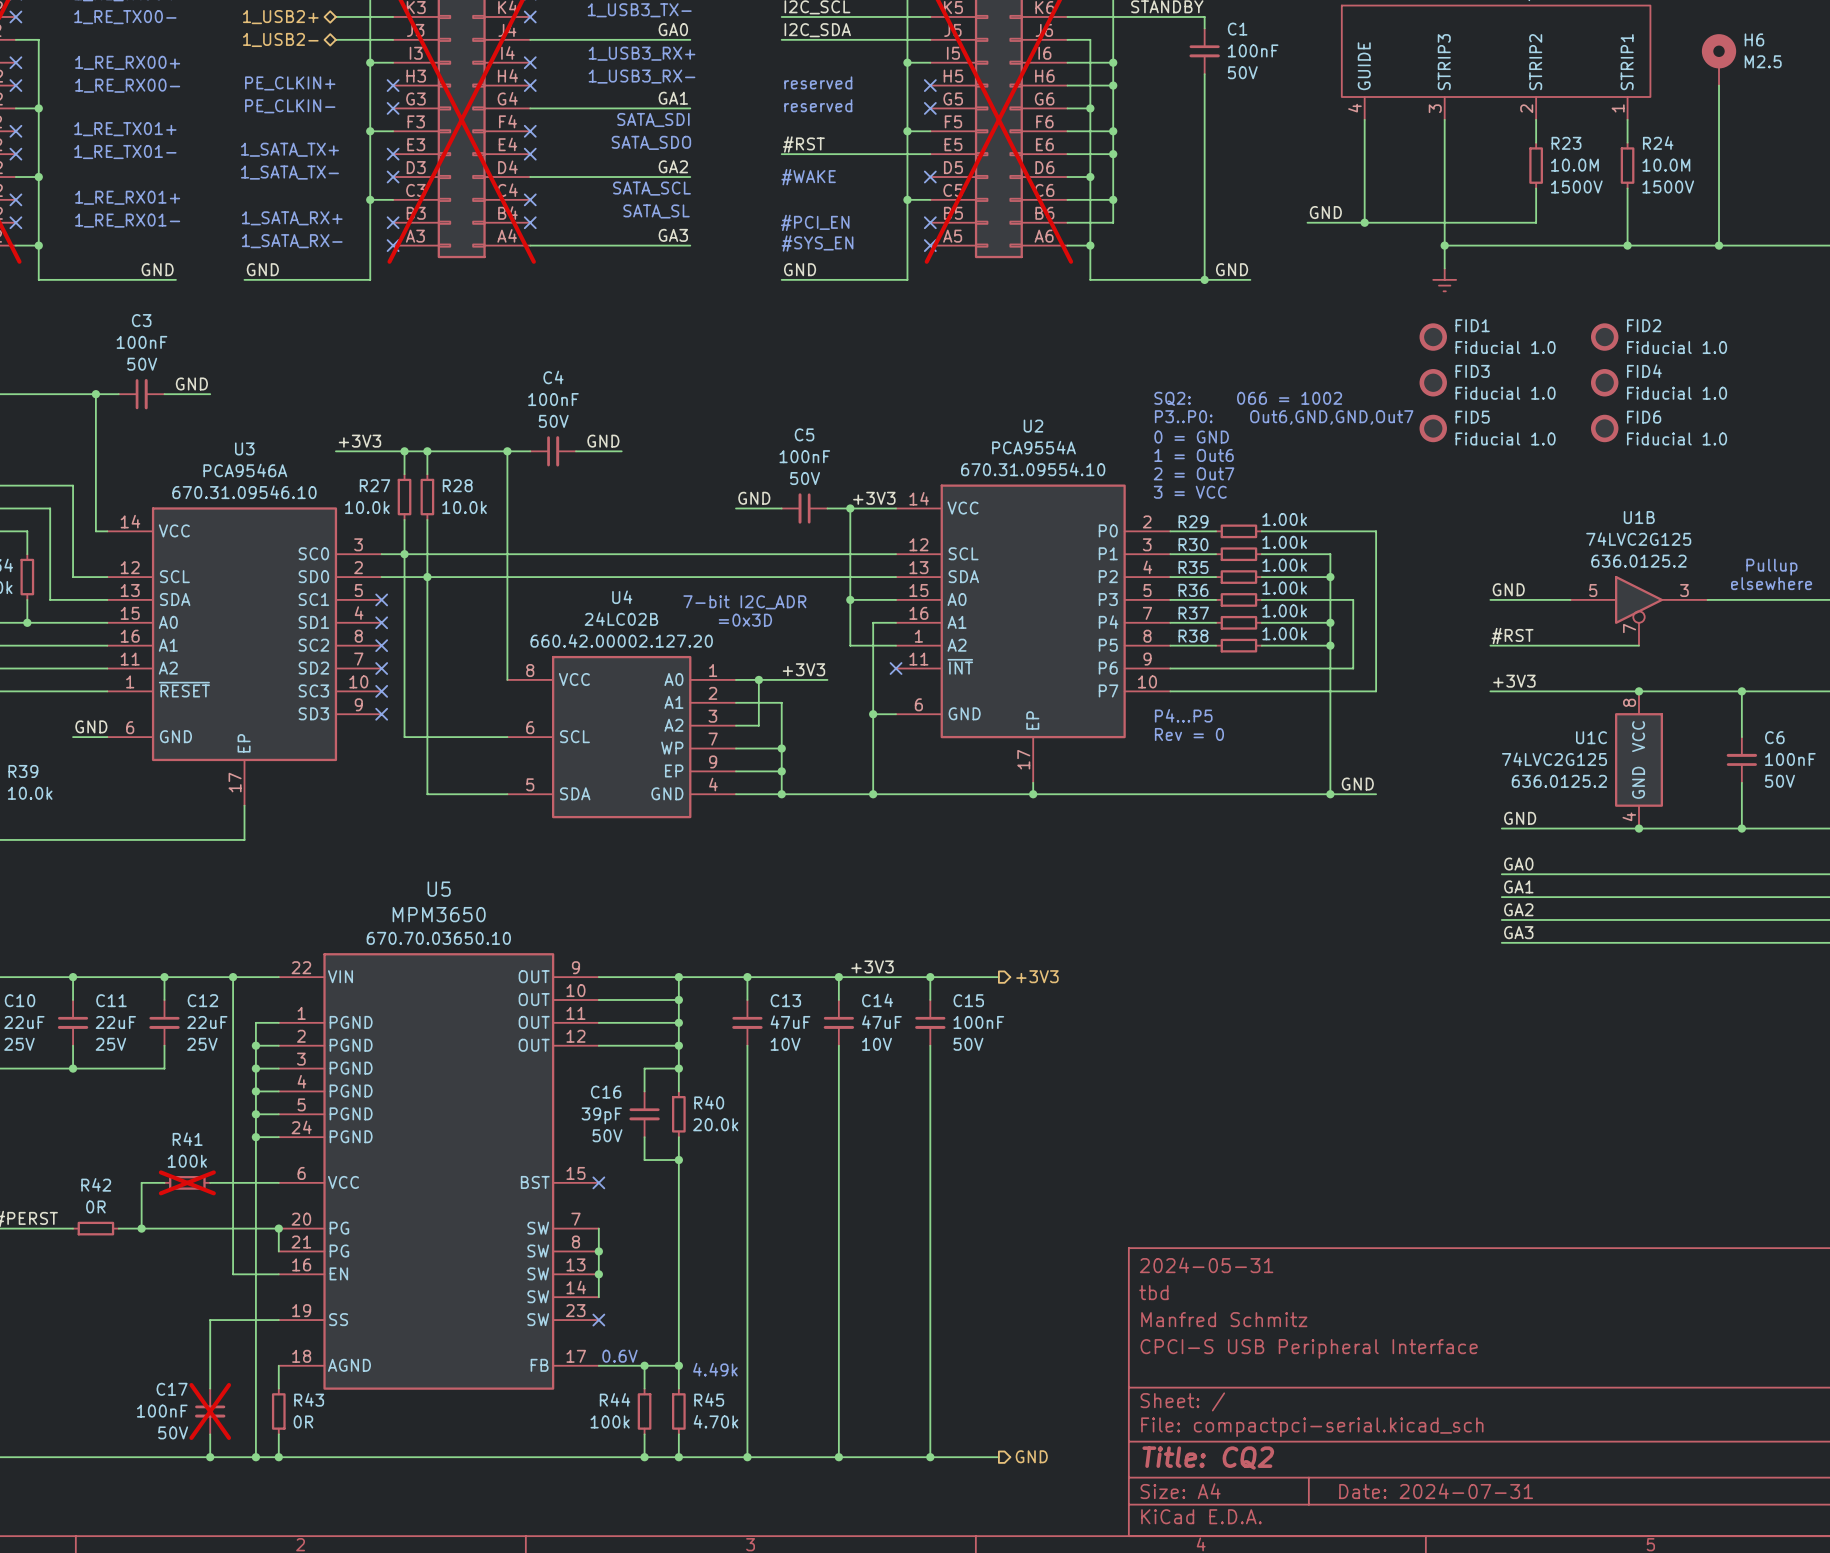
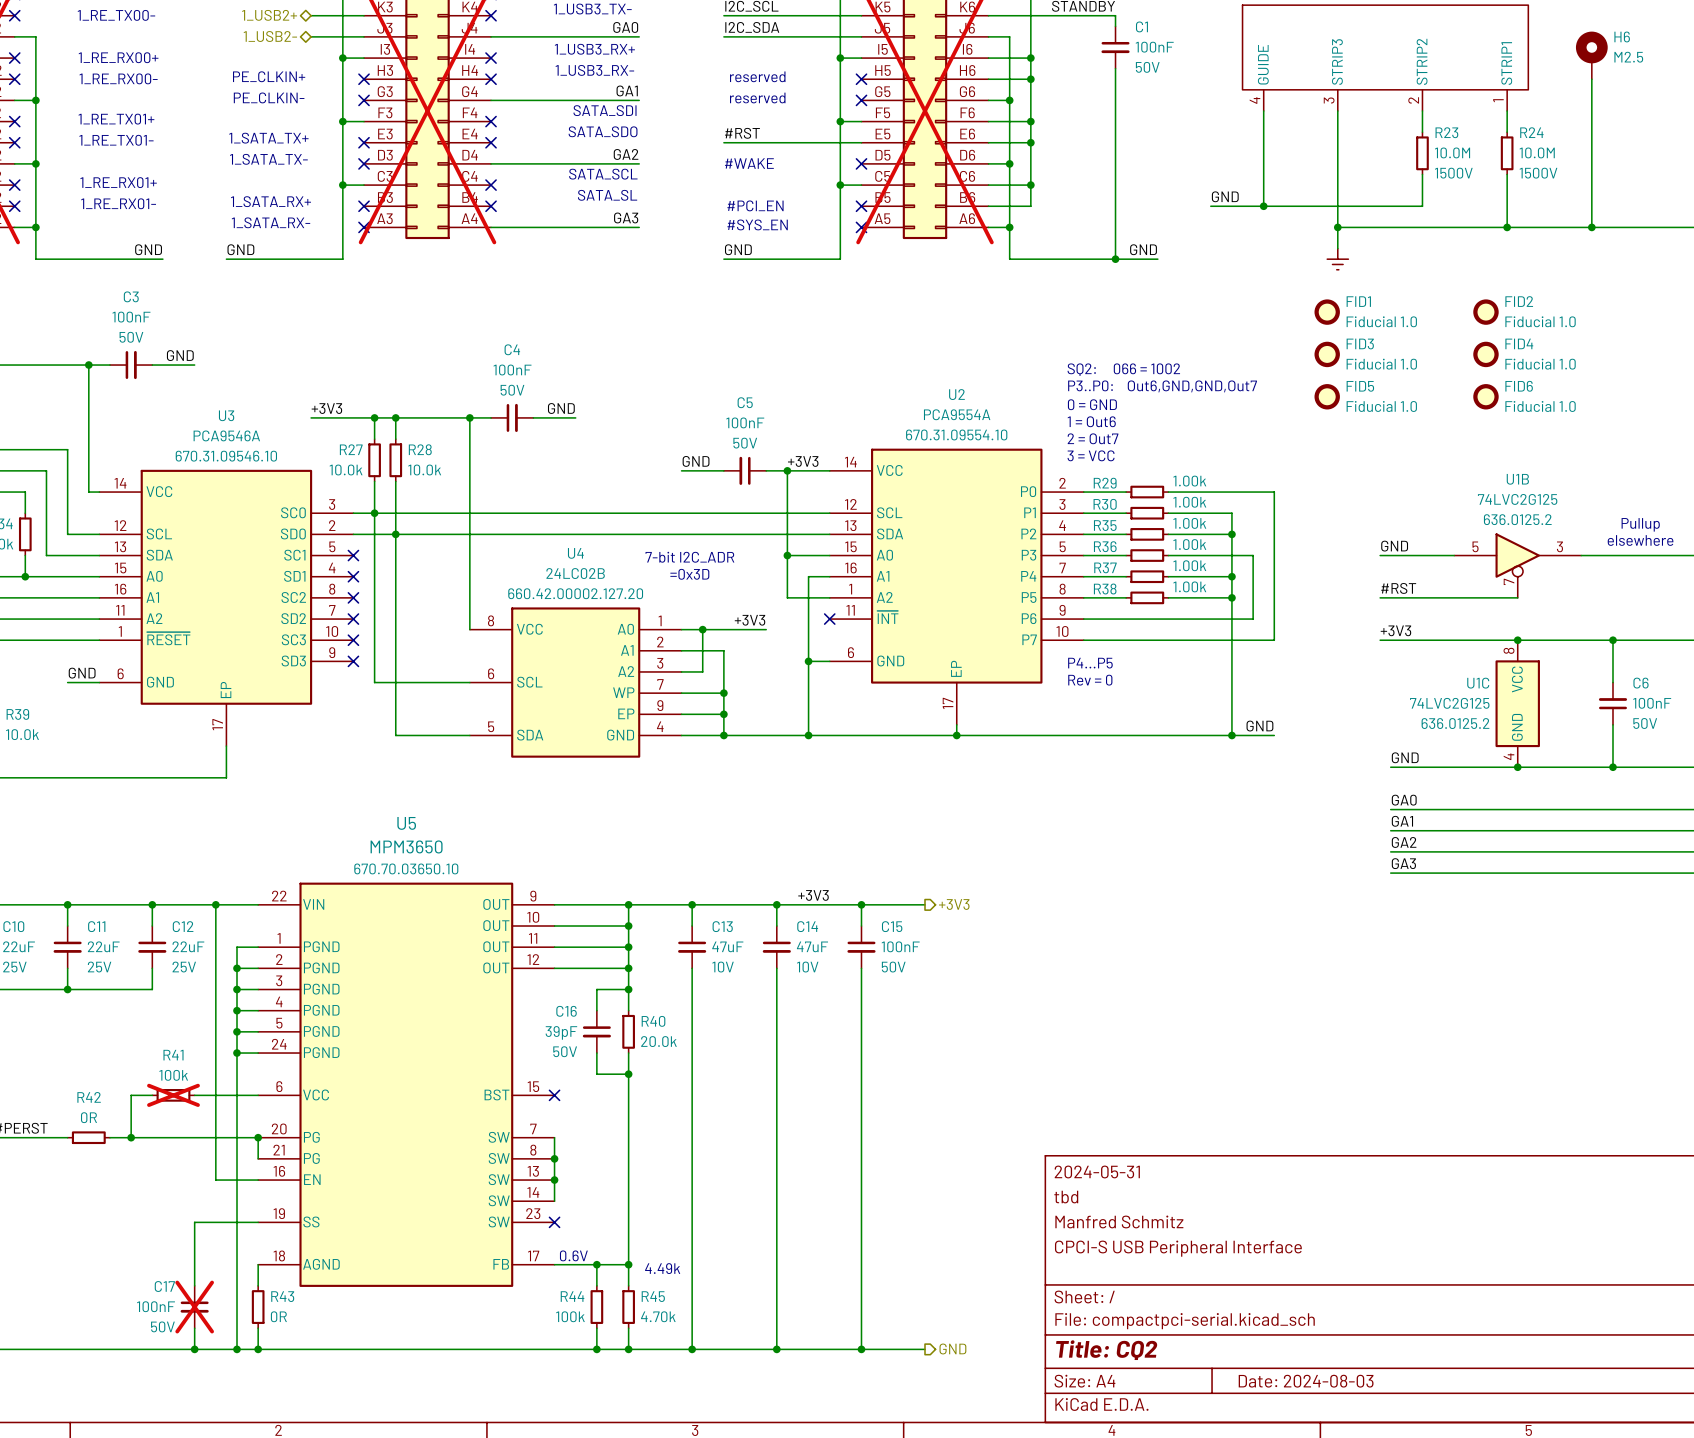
title block: Date: 2024-07-31 (1436, 1491) -> Date: 2024-08-03 (1306, 1381)

